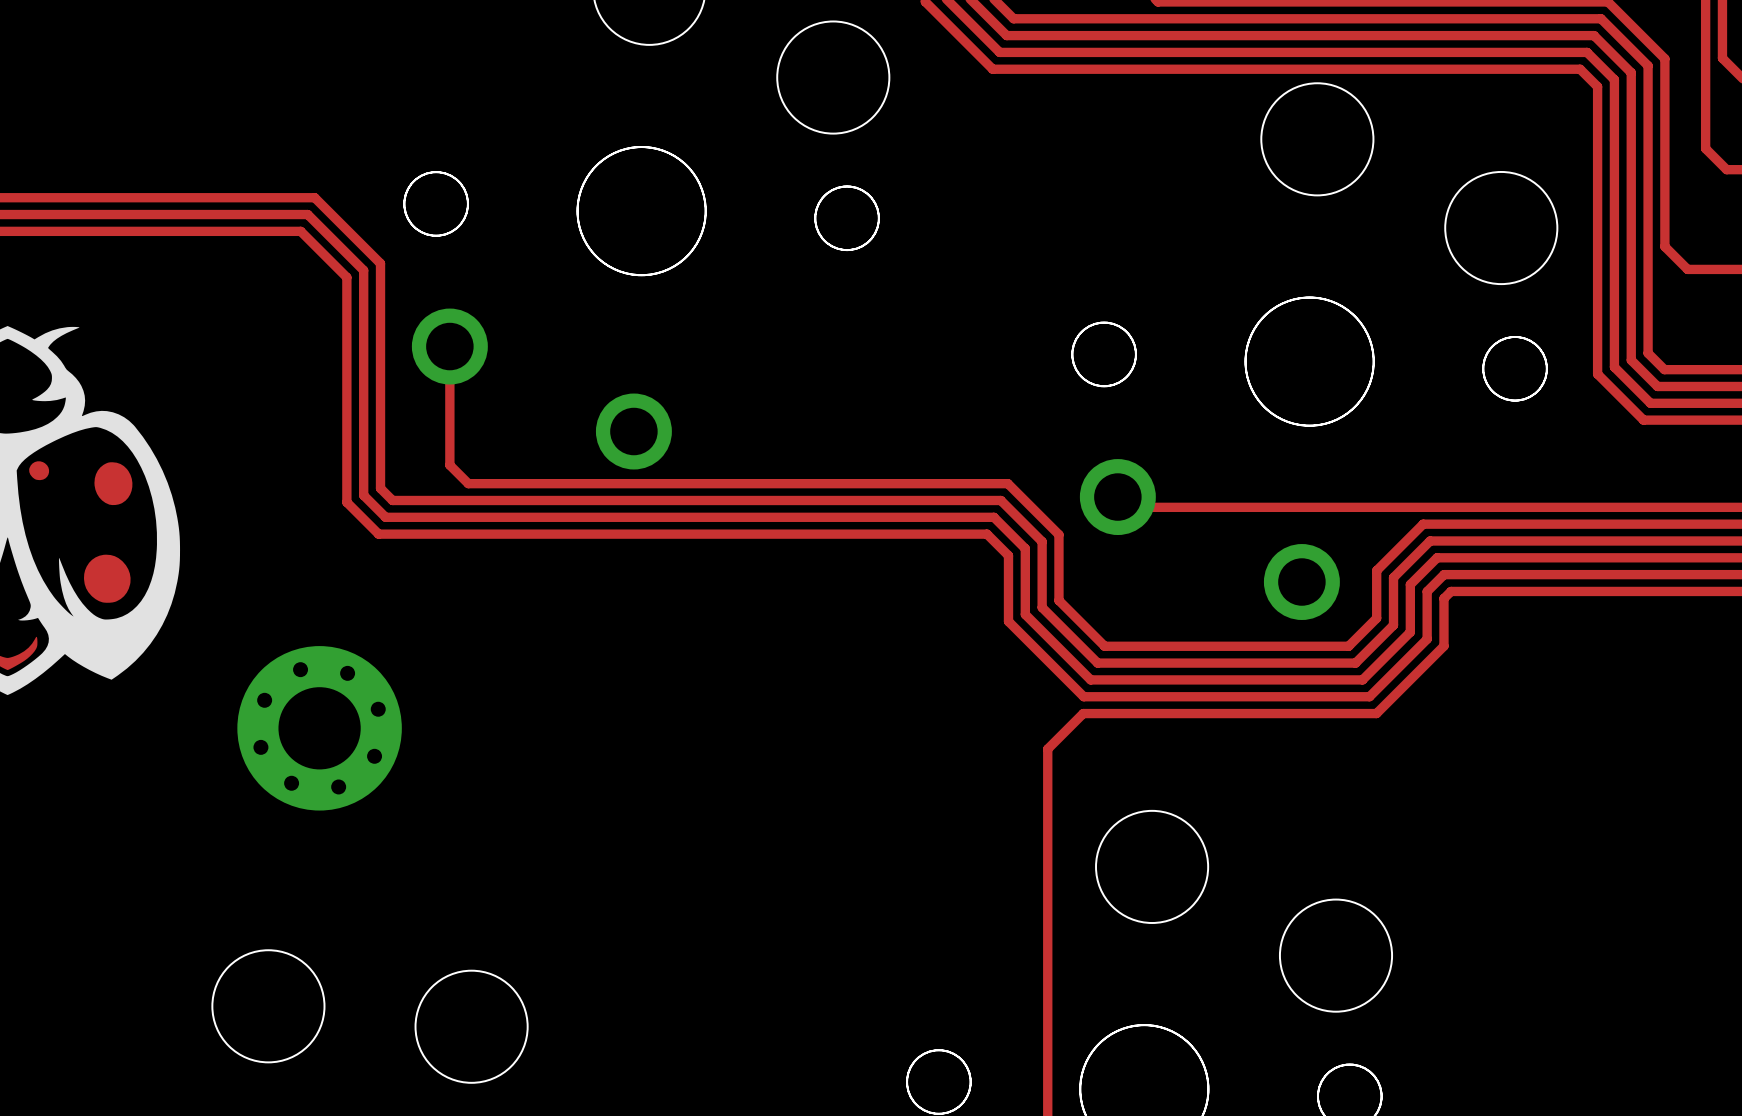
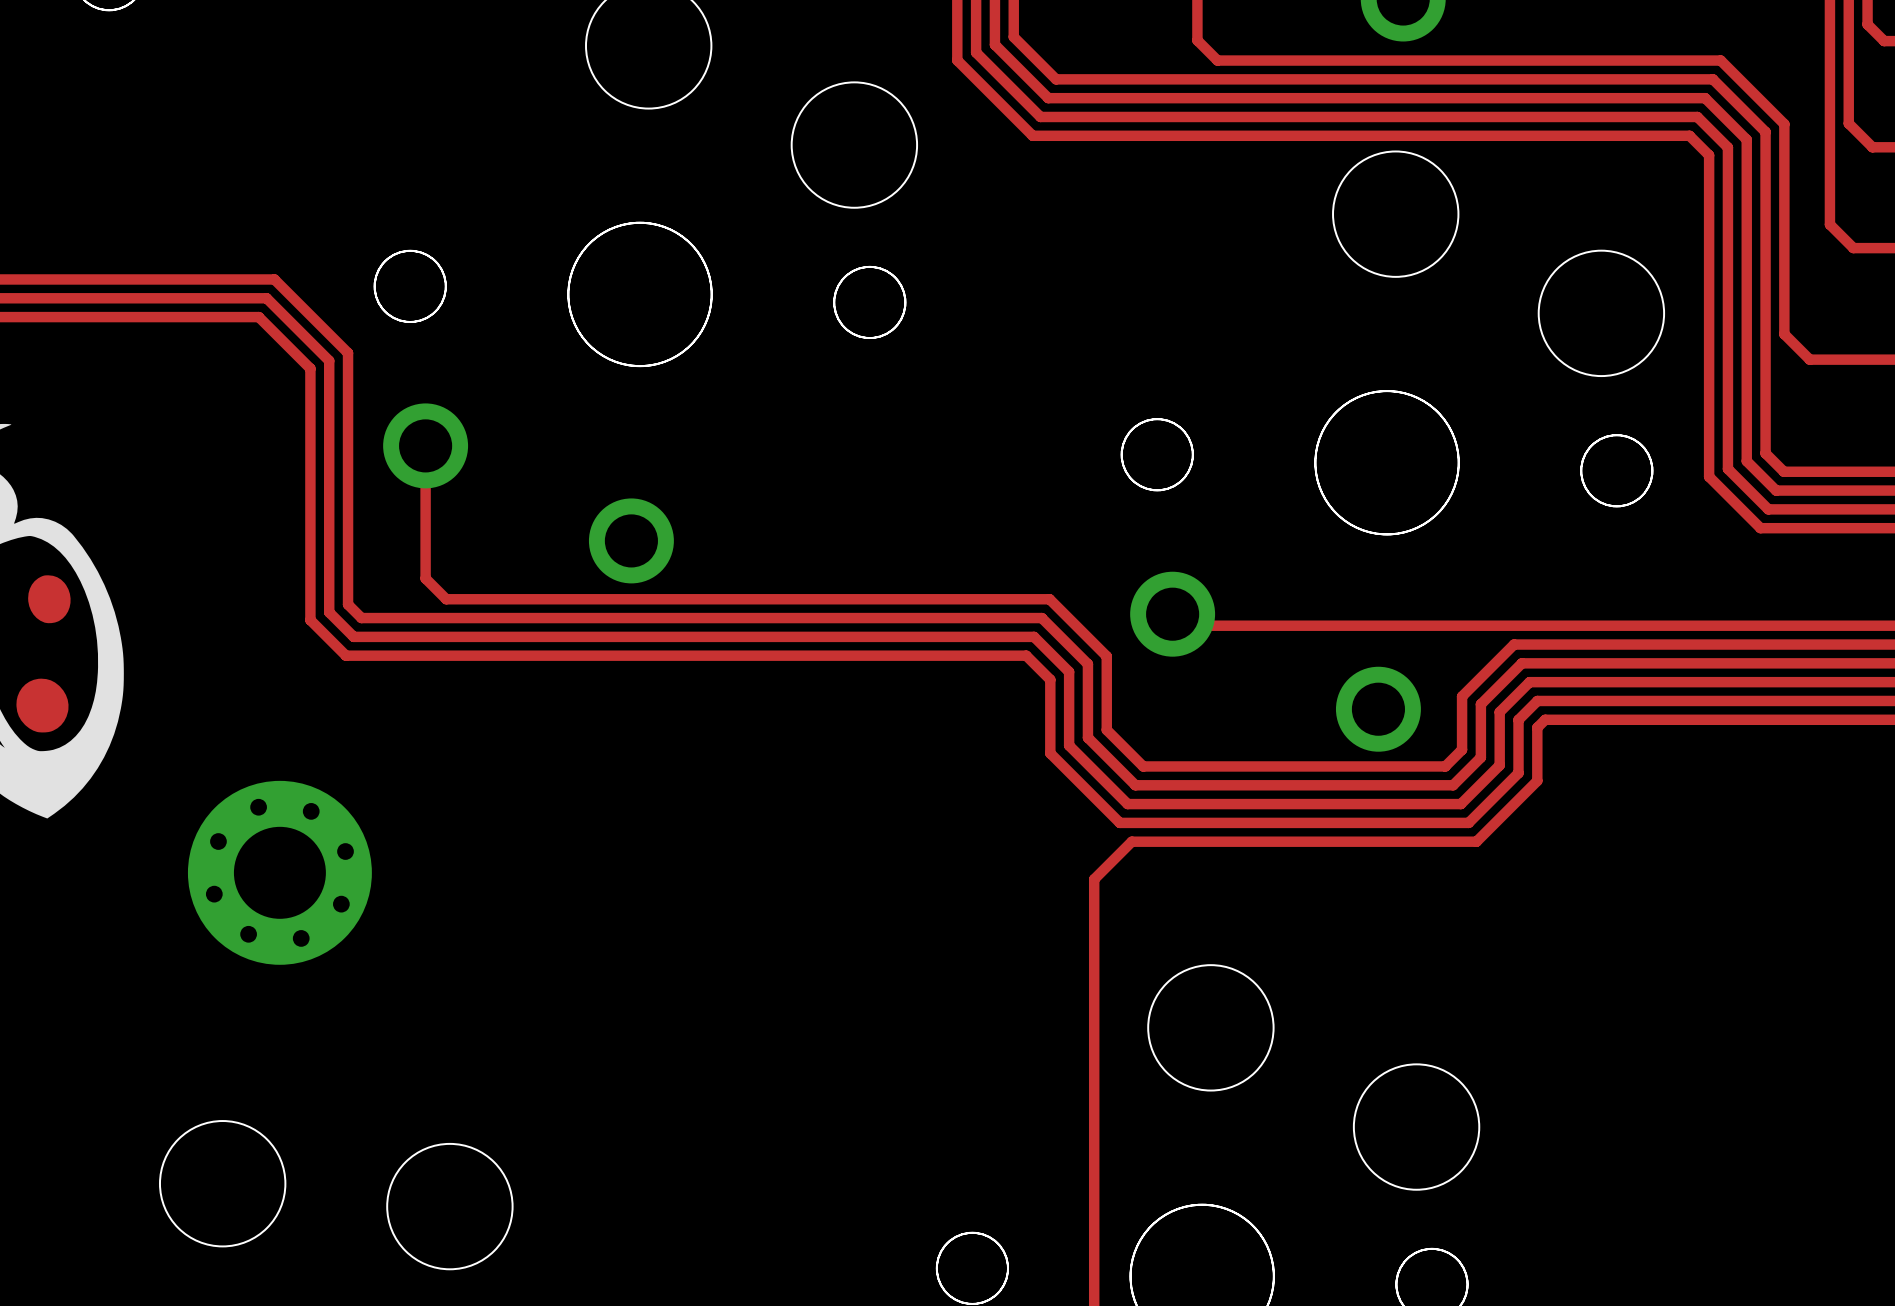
track: (1091, 633) (1104, 646) (1348, 646) (1361, 633) -> (1143, 766) (1445, 766)
track: (1084, 650) (1097, 663) (1355, 663) (1368, 650) -> (1135, 785) (1453, 785)
track: (1077, 666) (1090, 679) (1362, 679) (1375, 666) -> (1127, 804) (1460, 804)
track: (1070, 683) (1083, 696) (1369, 696) (1382, 683) -> (1119, 822) (1468, 822)
track: (1389, 700) (1376, 713) (1083, 713) (1047, 749) -> (1476, 841) (1131, 841) (1094, 879) (1094, 896)

